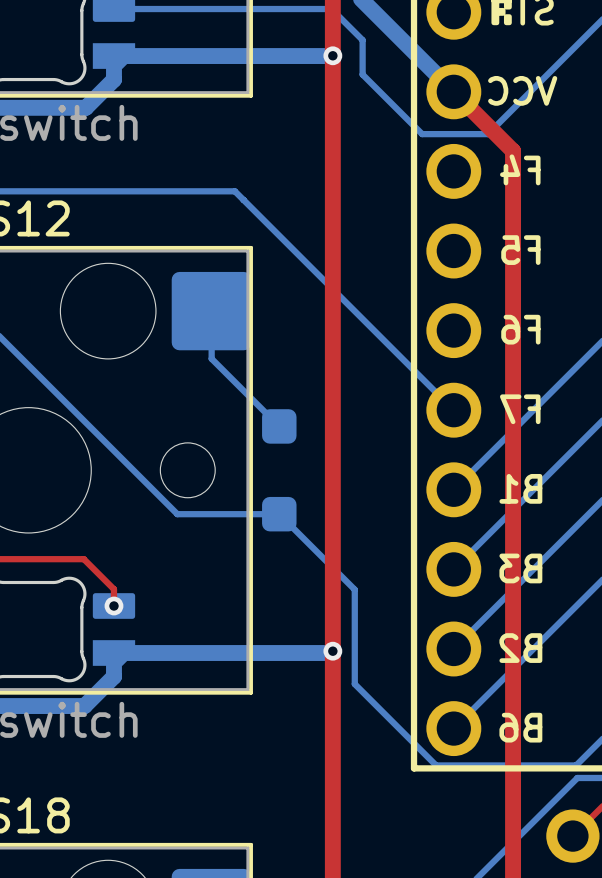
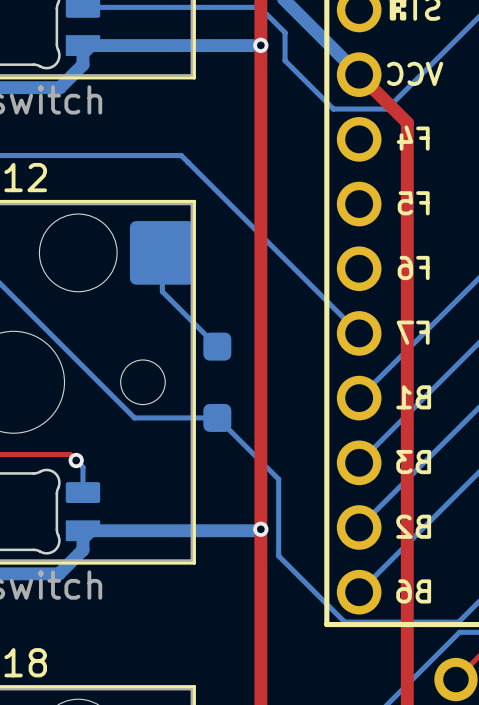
top track: (83, 559) (113, 589) (113, 606) -> (58, 454) (70, 454) (76, 460)
bottom track: none -> (76, 460) (82, 467) (82, 492)
via position: (113, 606) -> (76, 460)

